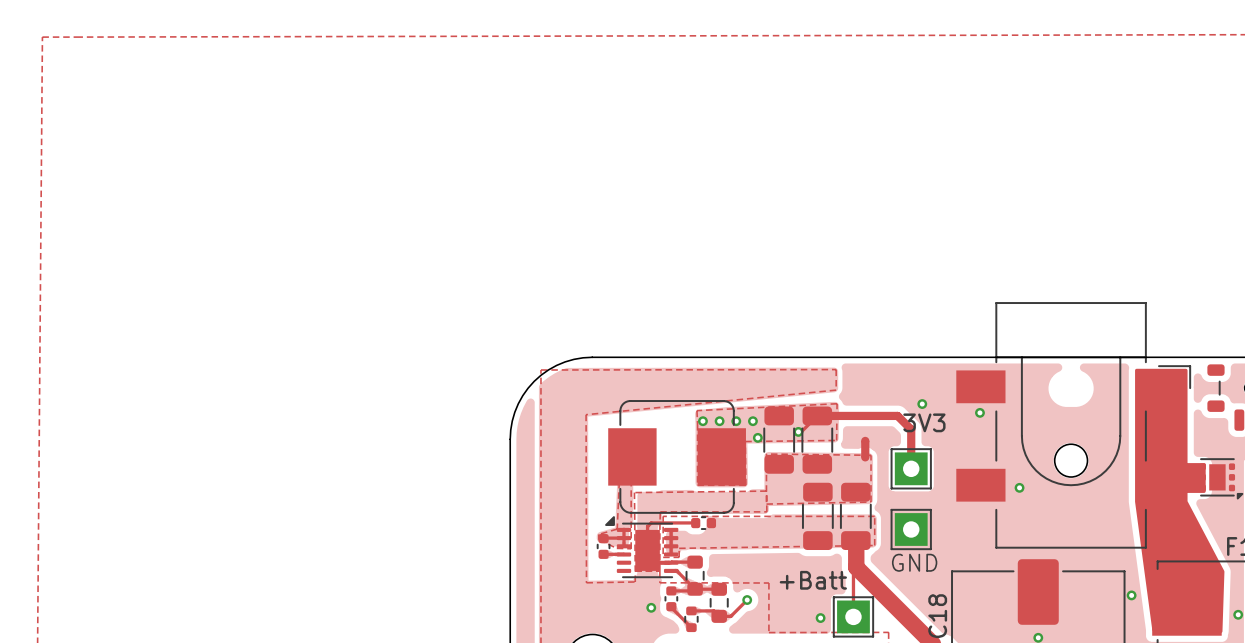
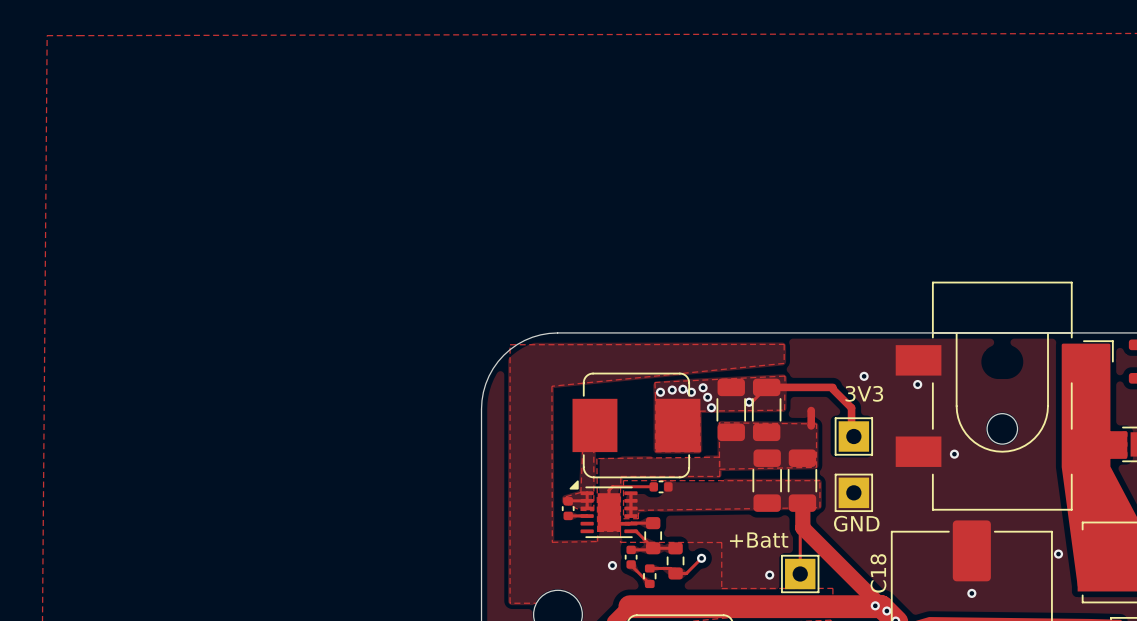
track: (888, 415) (897, 415) (911, 429) (911, 468) -> none
via: none -> (703, 387)
track: none -> (833, 387) (851, 407) (851, 436)
via: none -> (682, 389)
via: none -> (672, 390)
via: (719, 421) -> none
via: (752, 421) -> none
via: none -> (707, 397)

